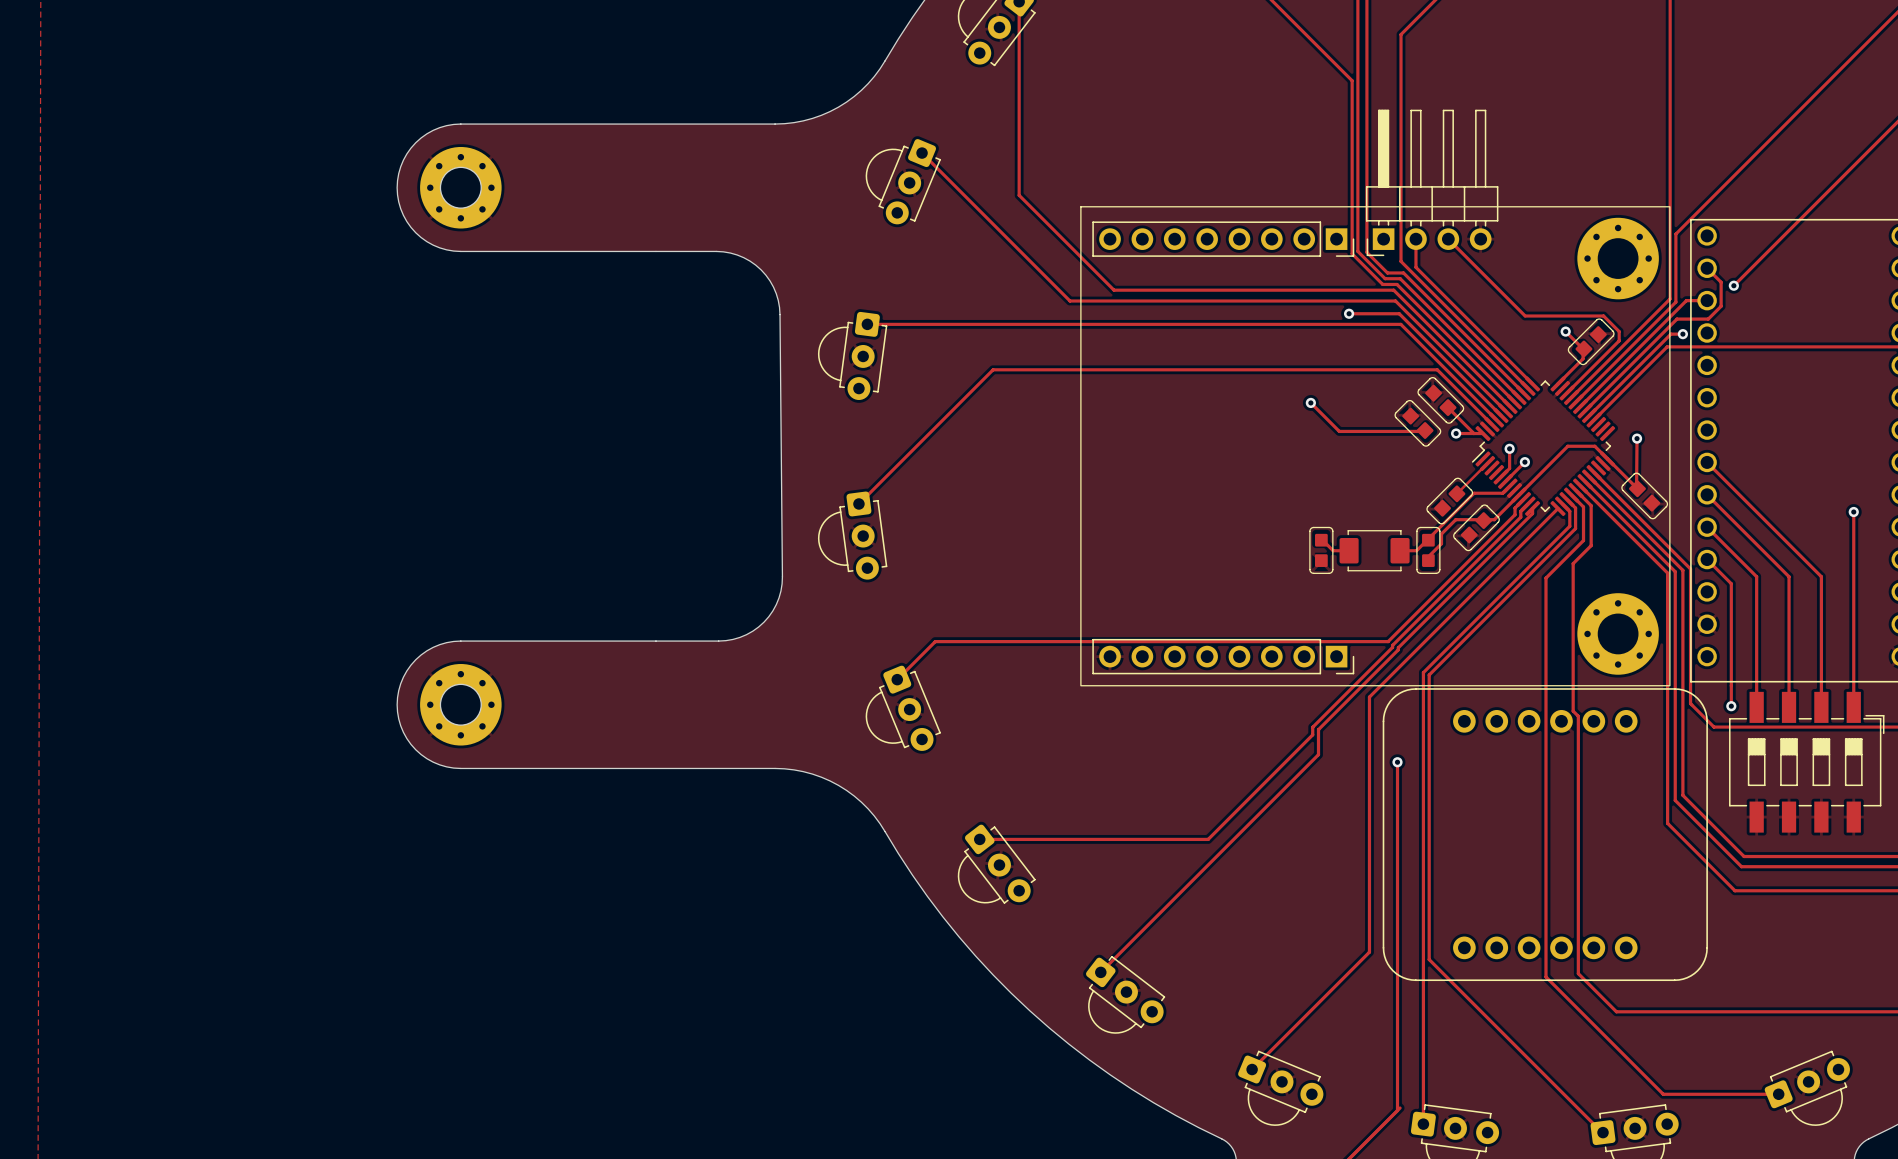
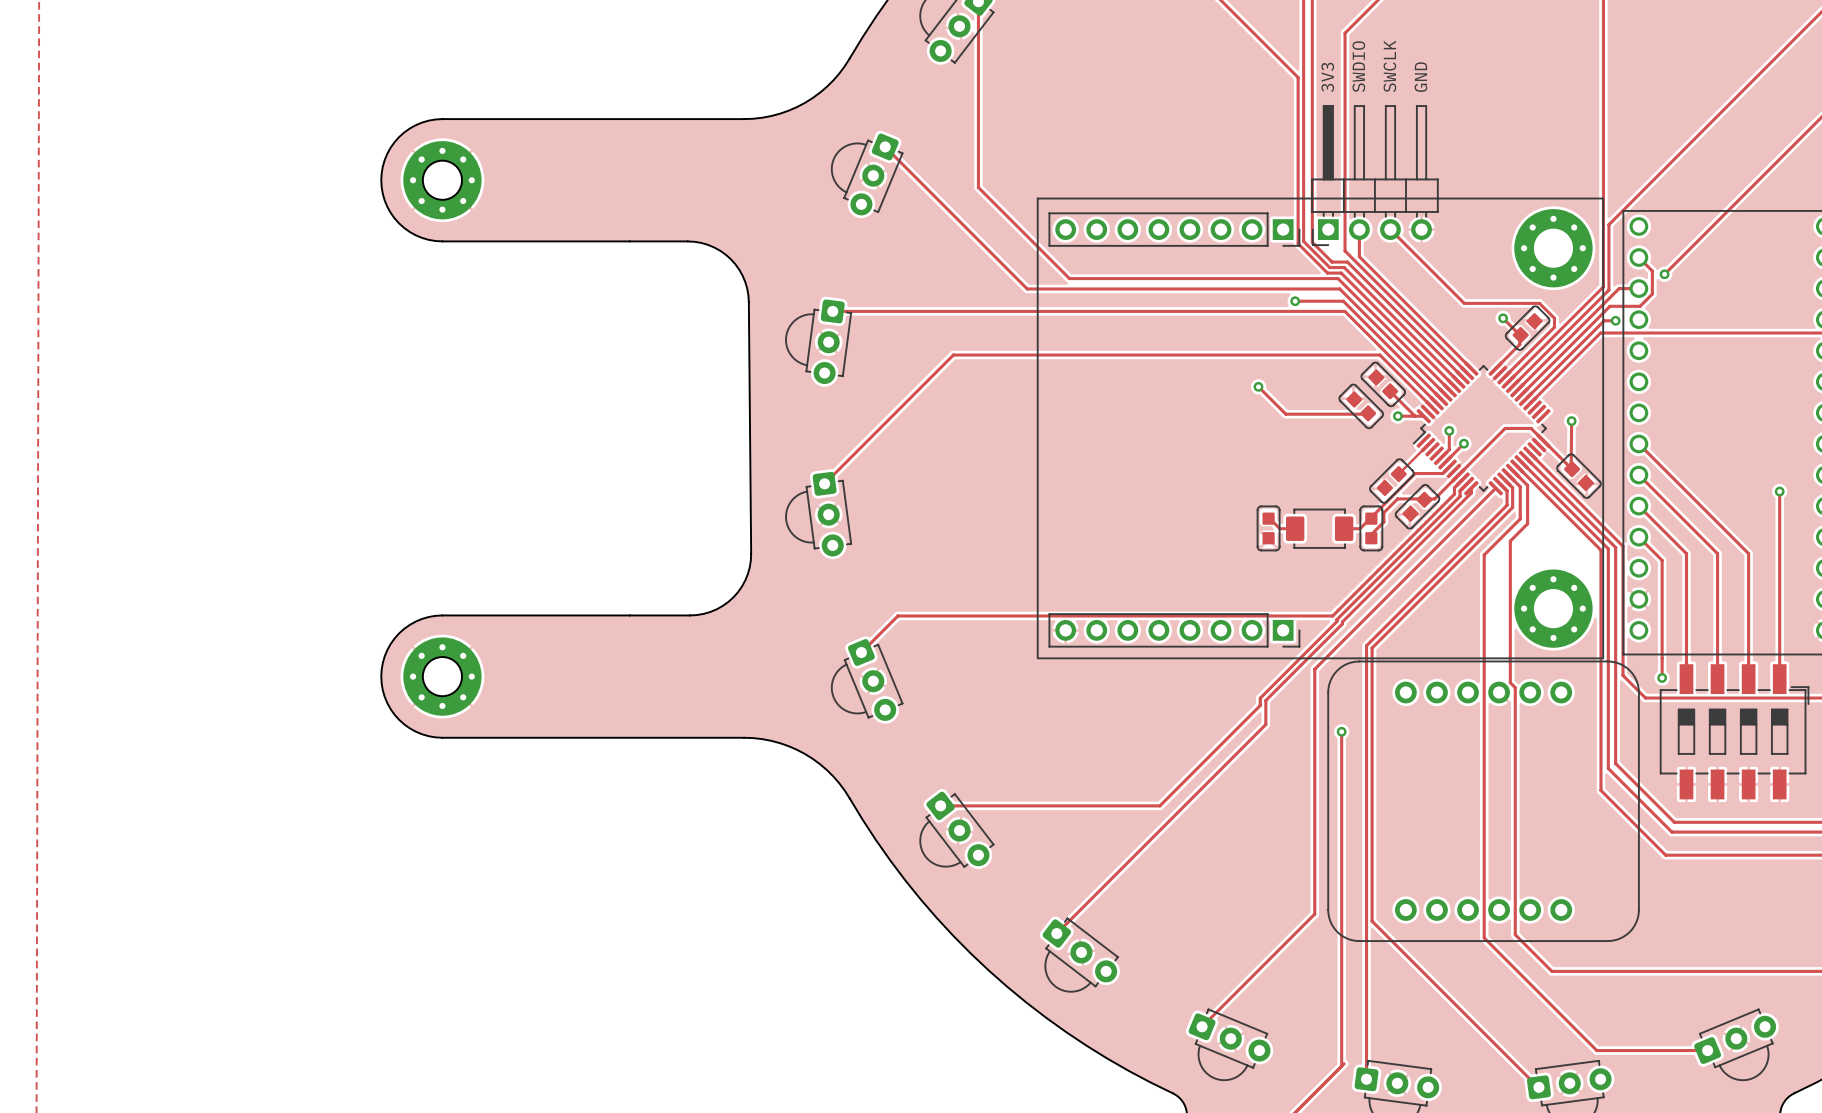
text: none -> SWCLK (1389, 66)
text: none -> SWDIO (1358, 66)
text: none -> GND (1420, 77)
text: none -> 3V3 (1327, 77)

